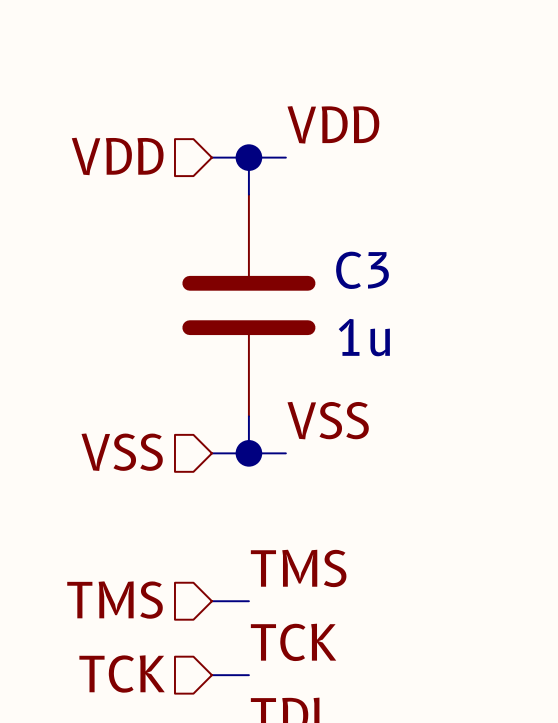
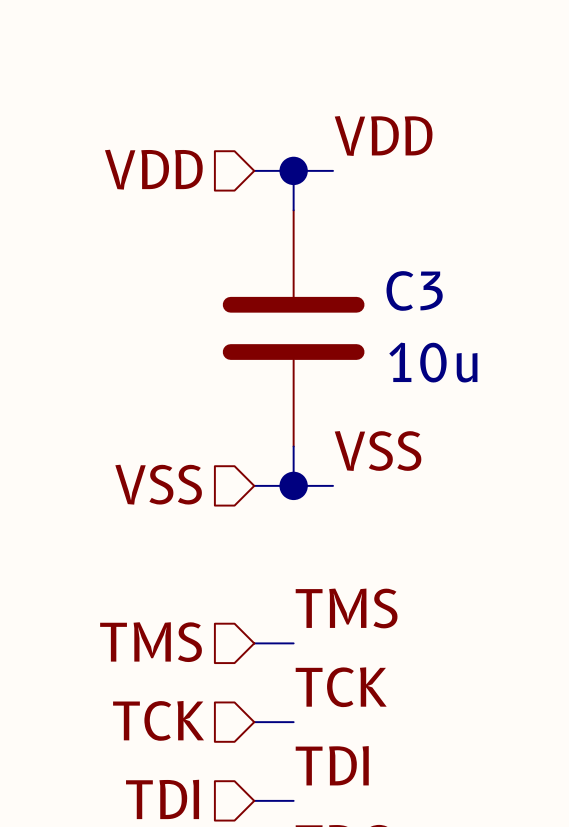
C3 value: 1u (364, 337) -> 10u (433, 362)

